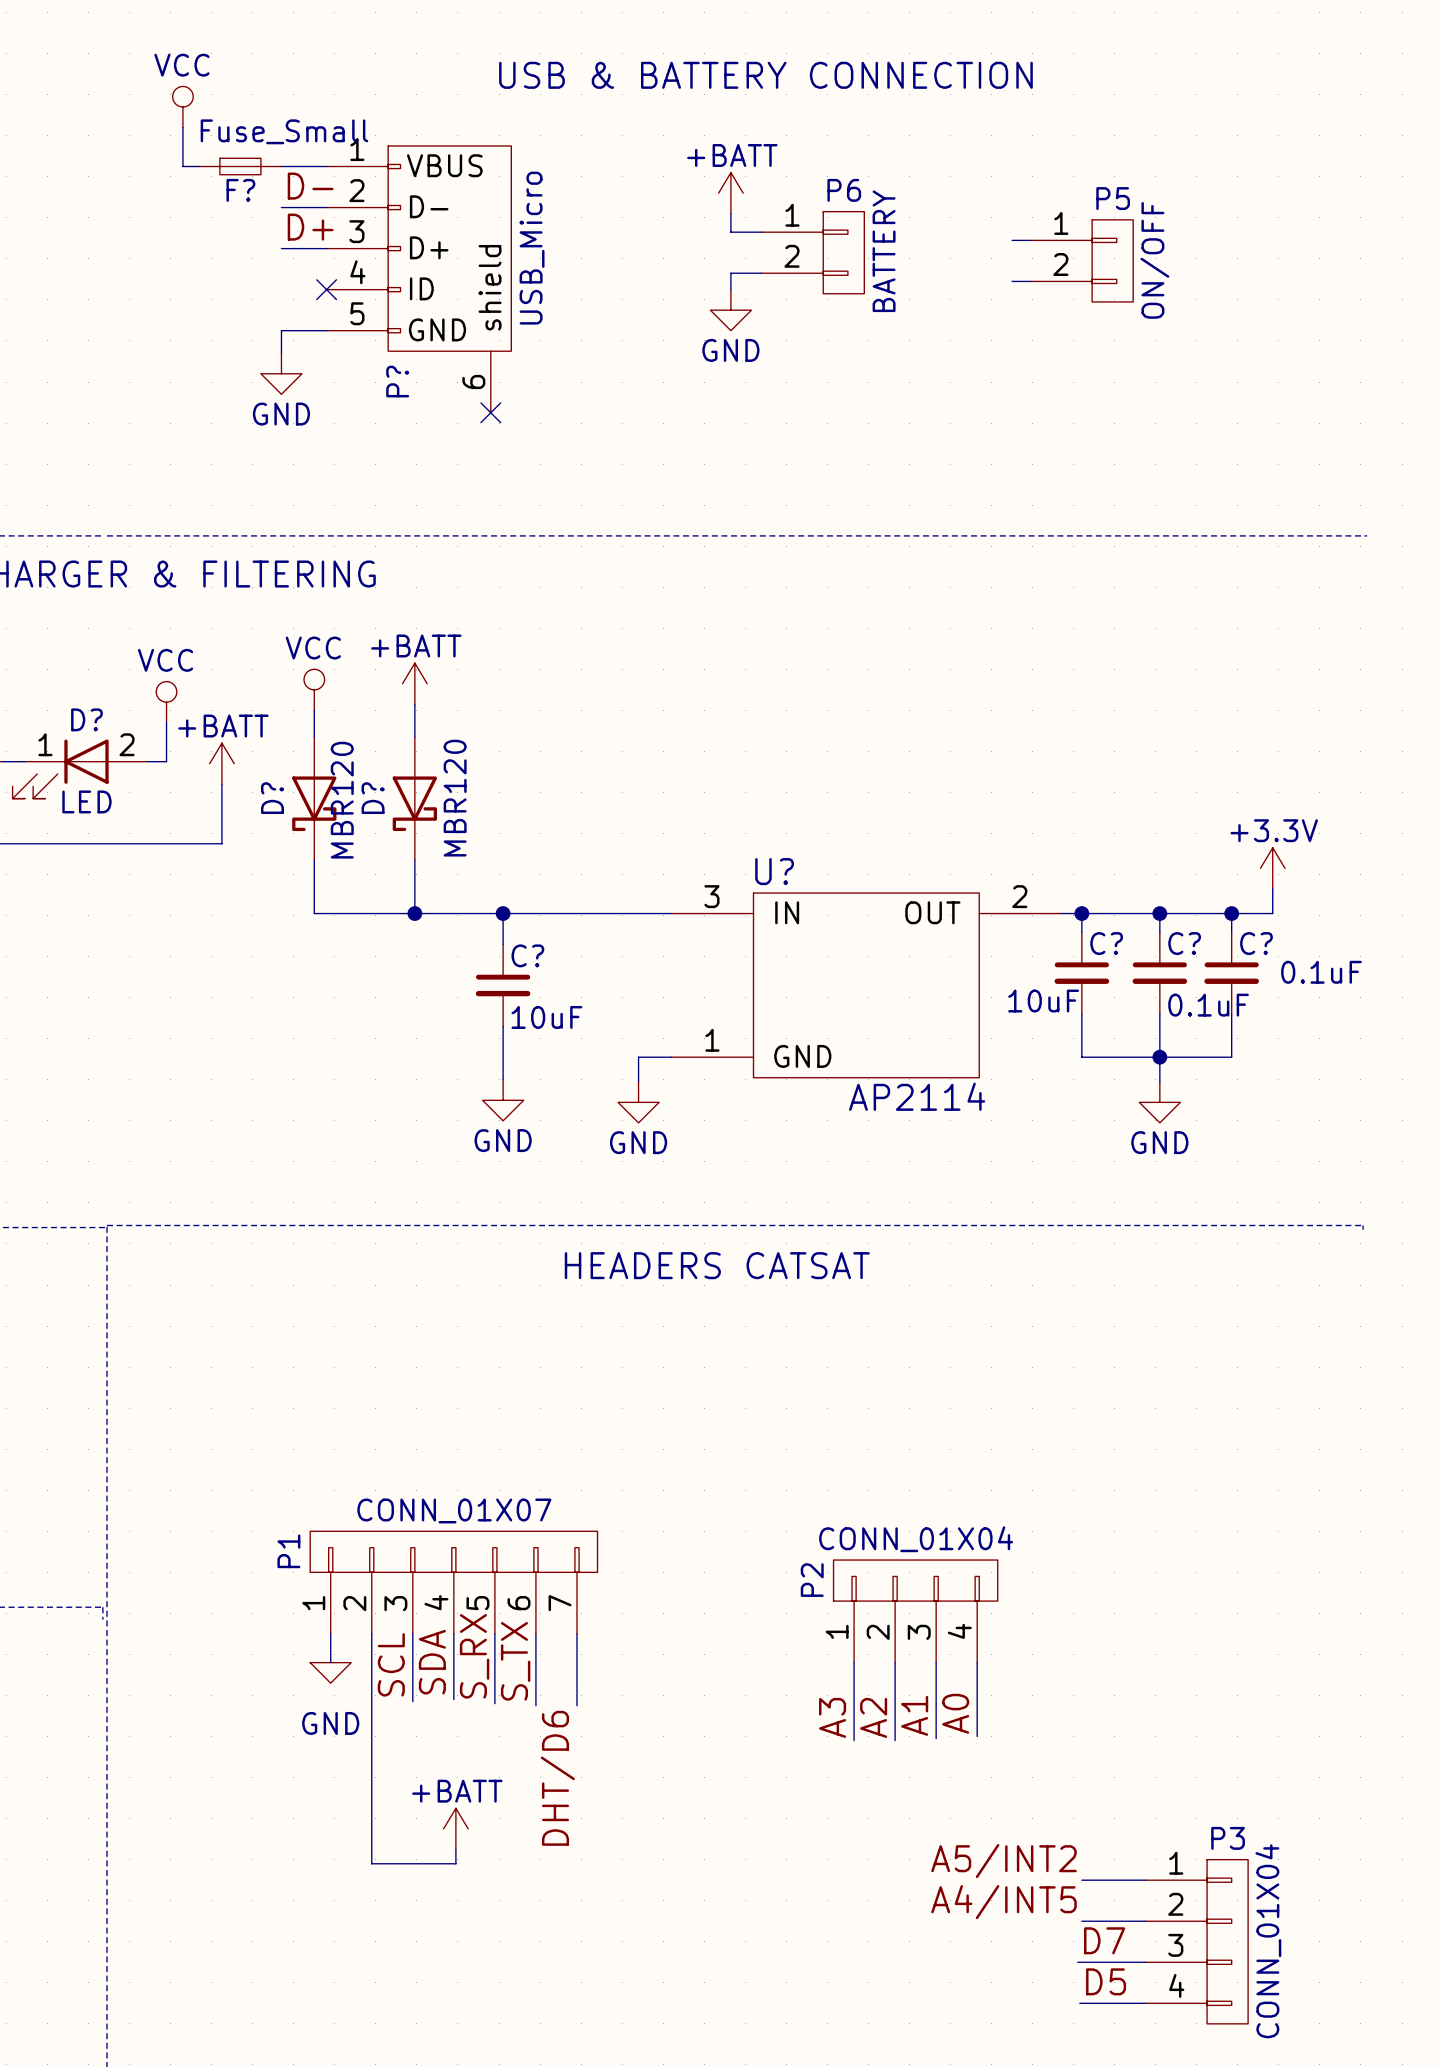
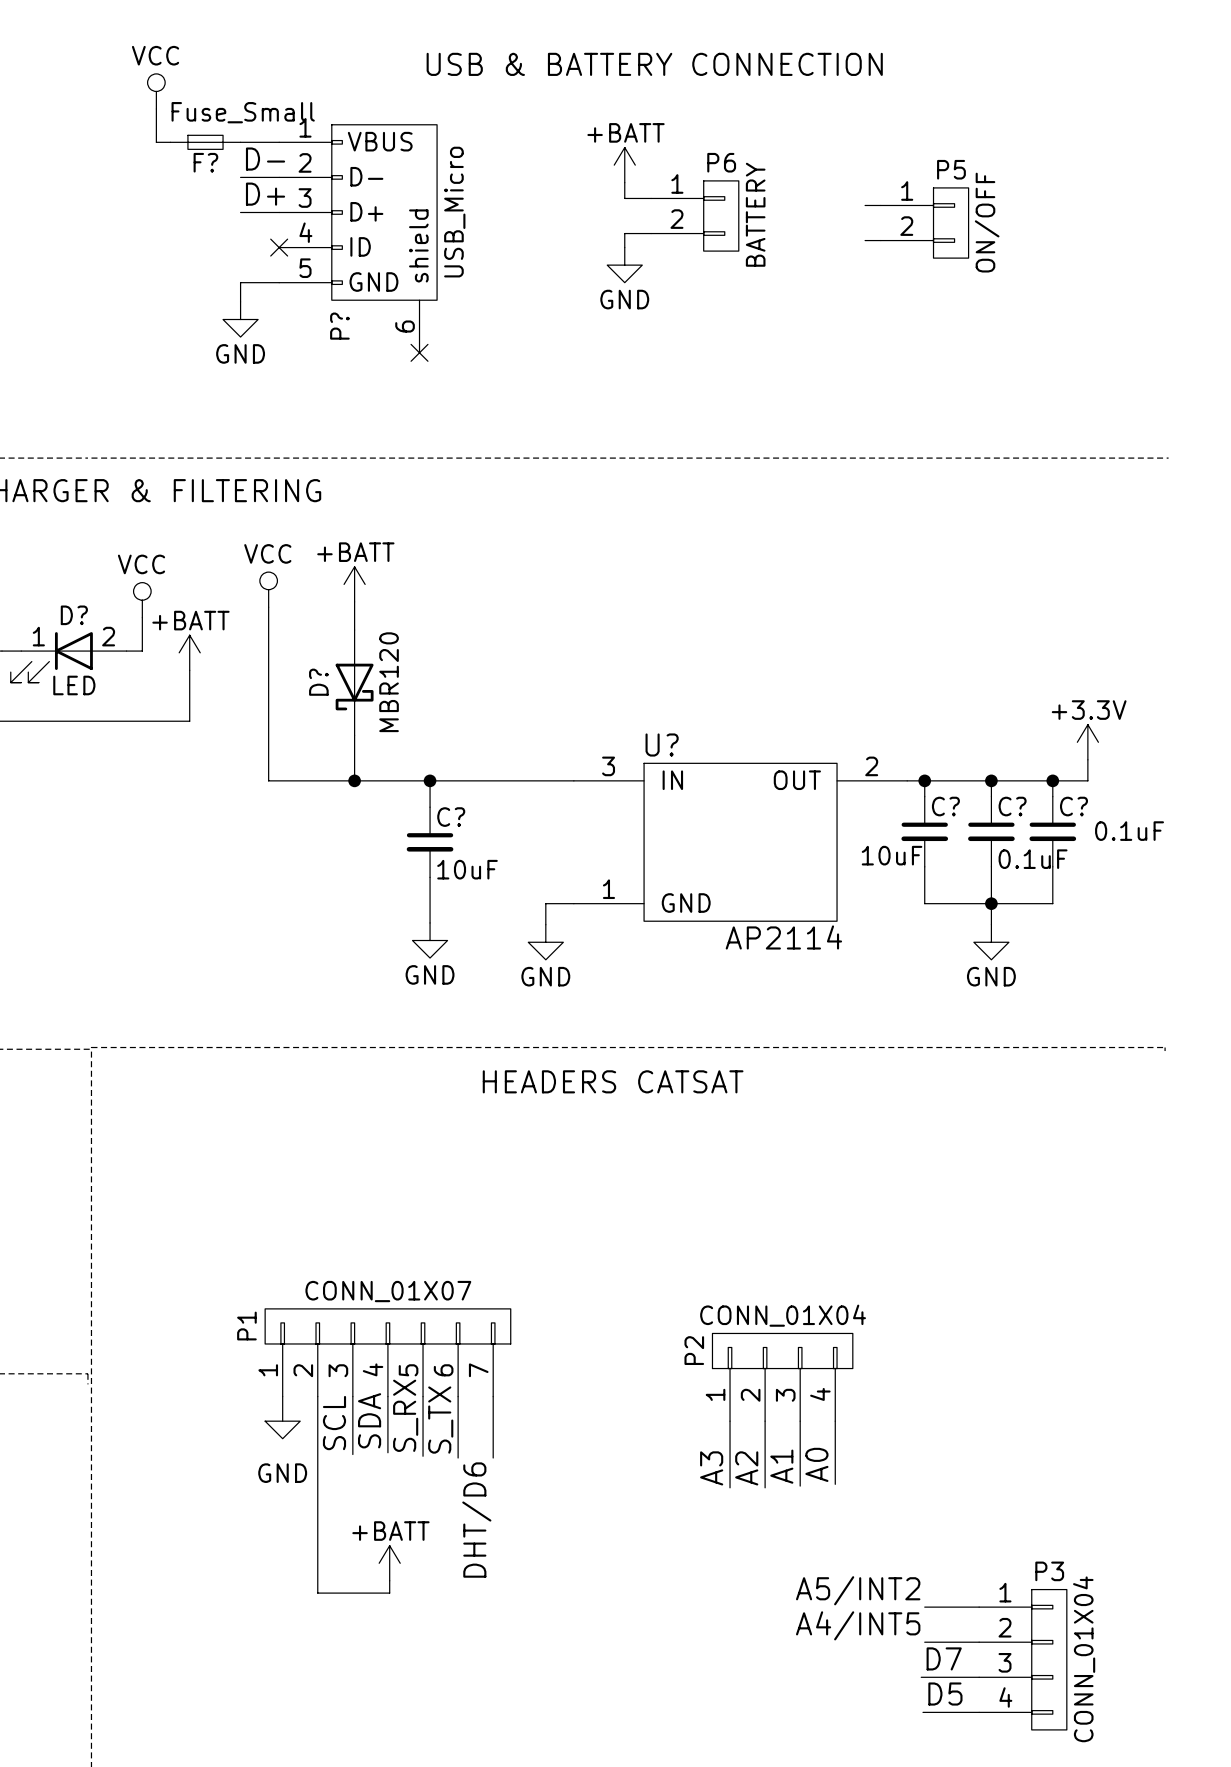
D?: MBR120 (314, 798) -> none

